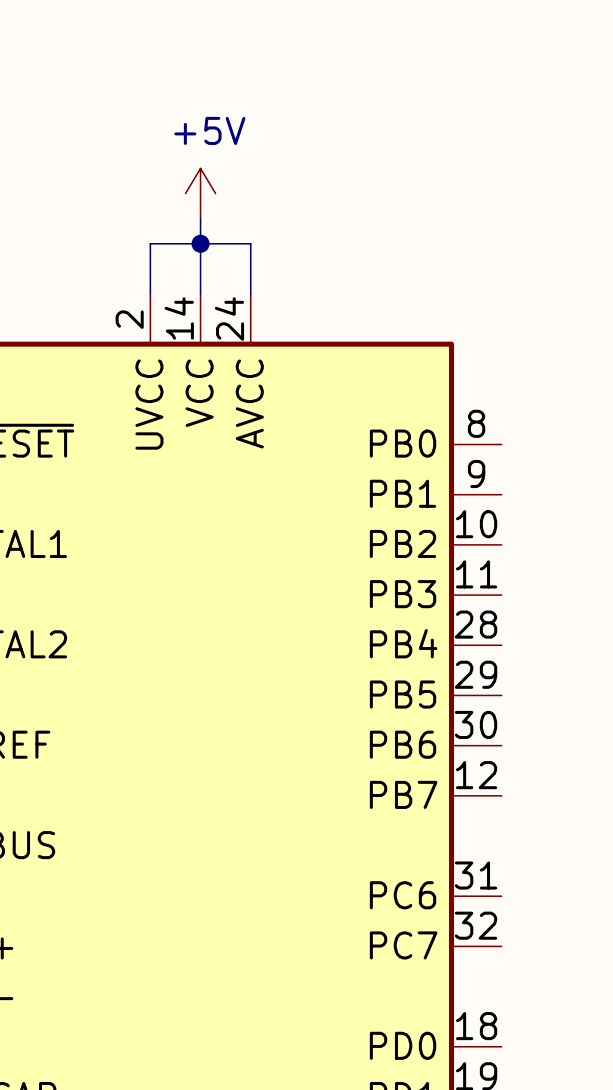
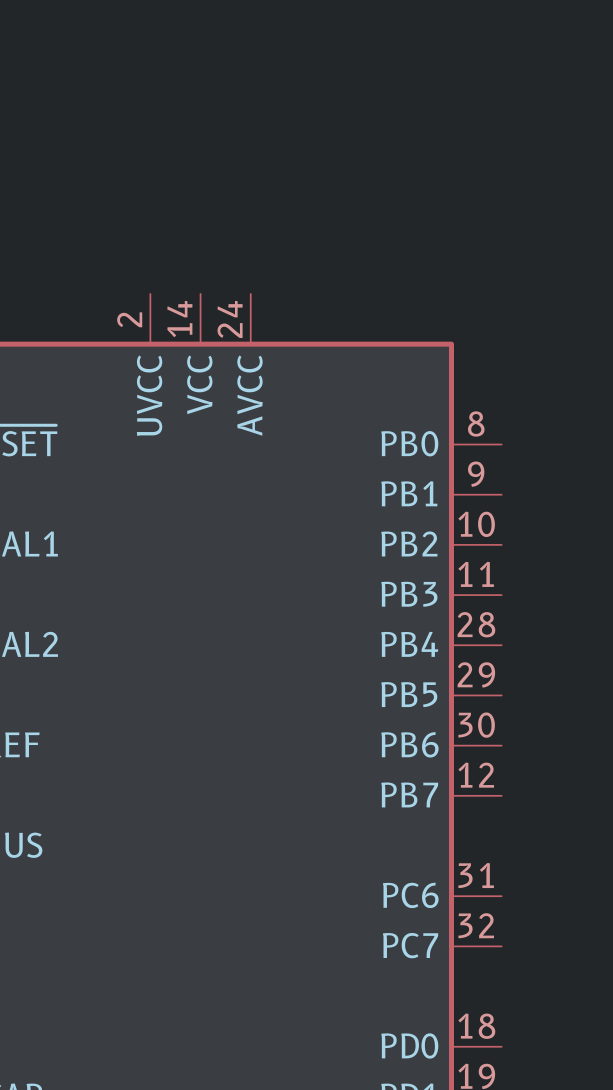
power symbol: +5V (200, 193) -> none
wire: (200, 218) (200, 293) -> none
junction: (200, 243) -> none
wire: (150, 293) (150, 243) (250, 243) (250, 293) -> none

